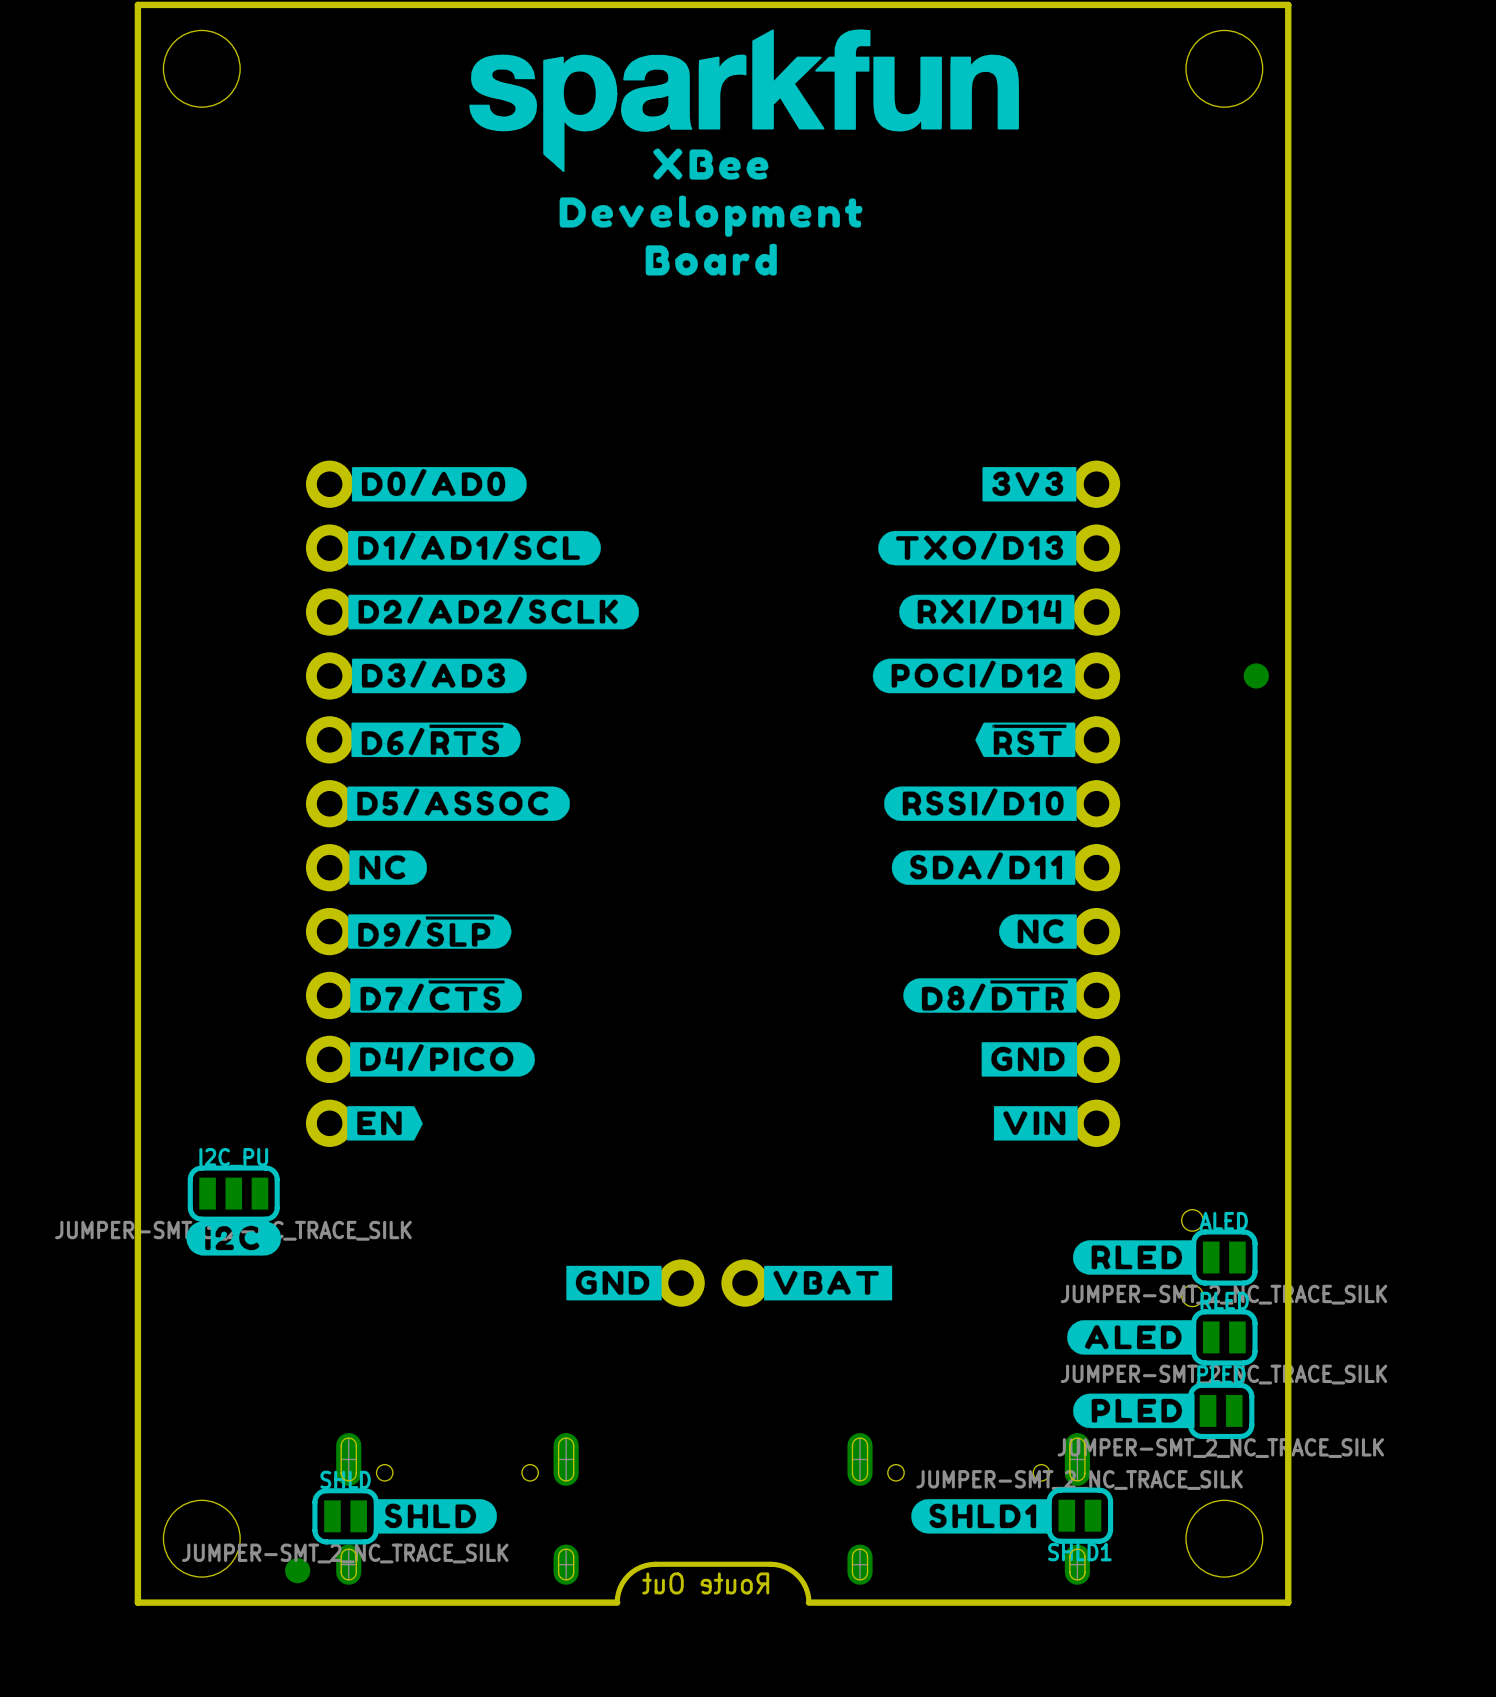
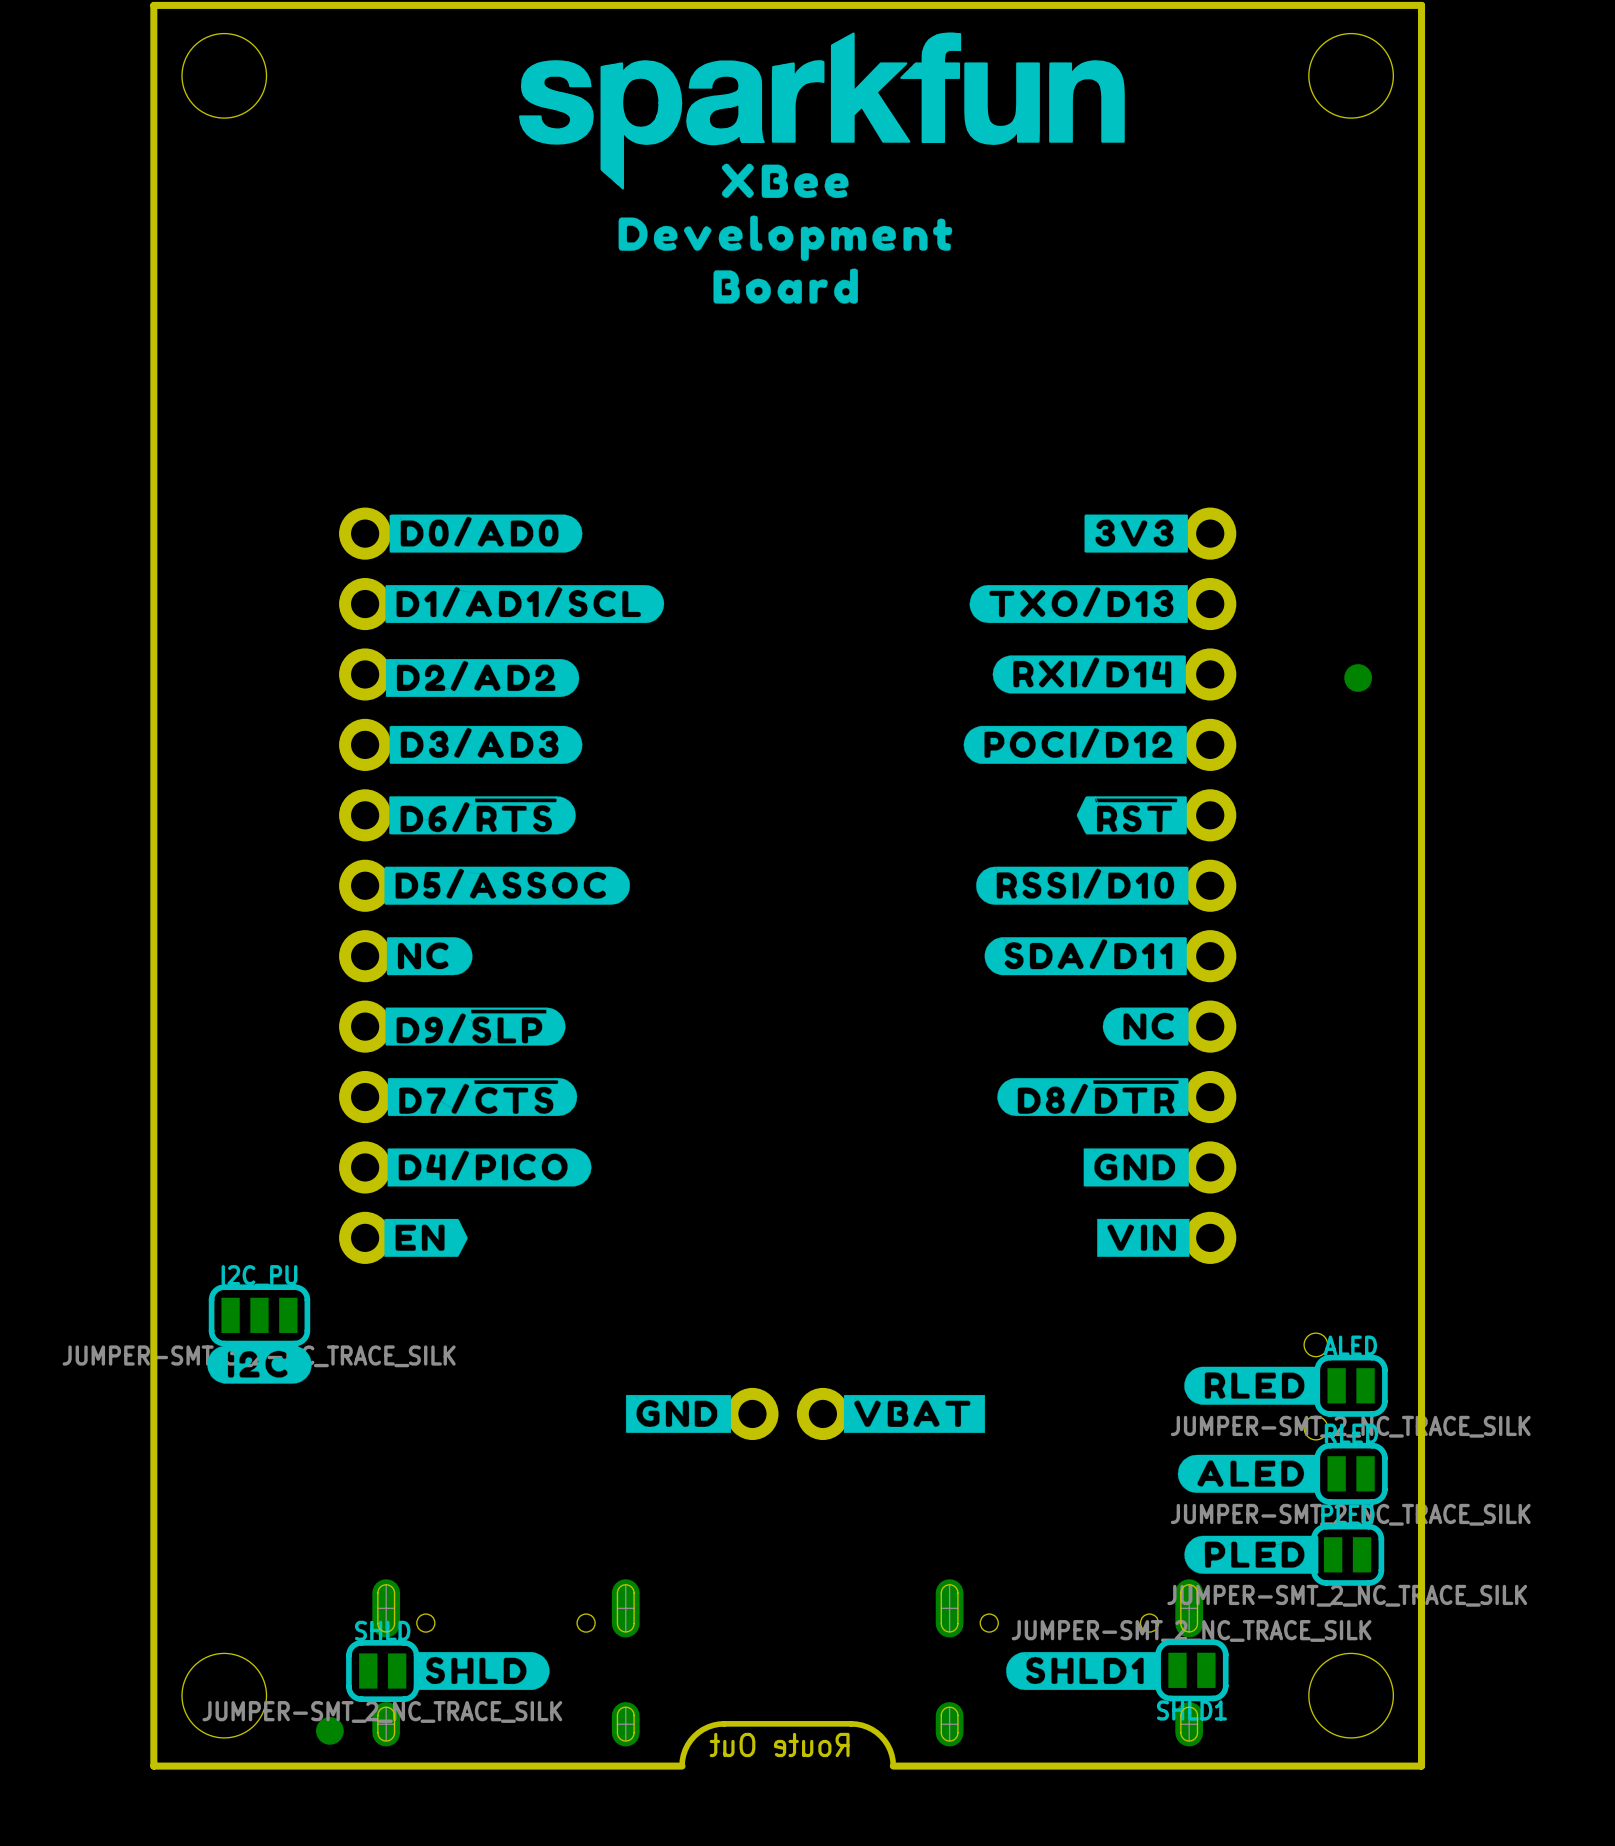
drawing: [348, 594, 639, 630] -> none
drawing: none -> [385, 659, 580, 697]
part position: (1256, 675) -> (1358, 677)

